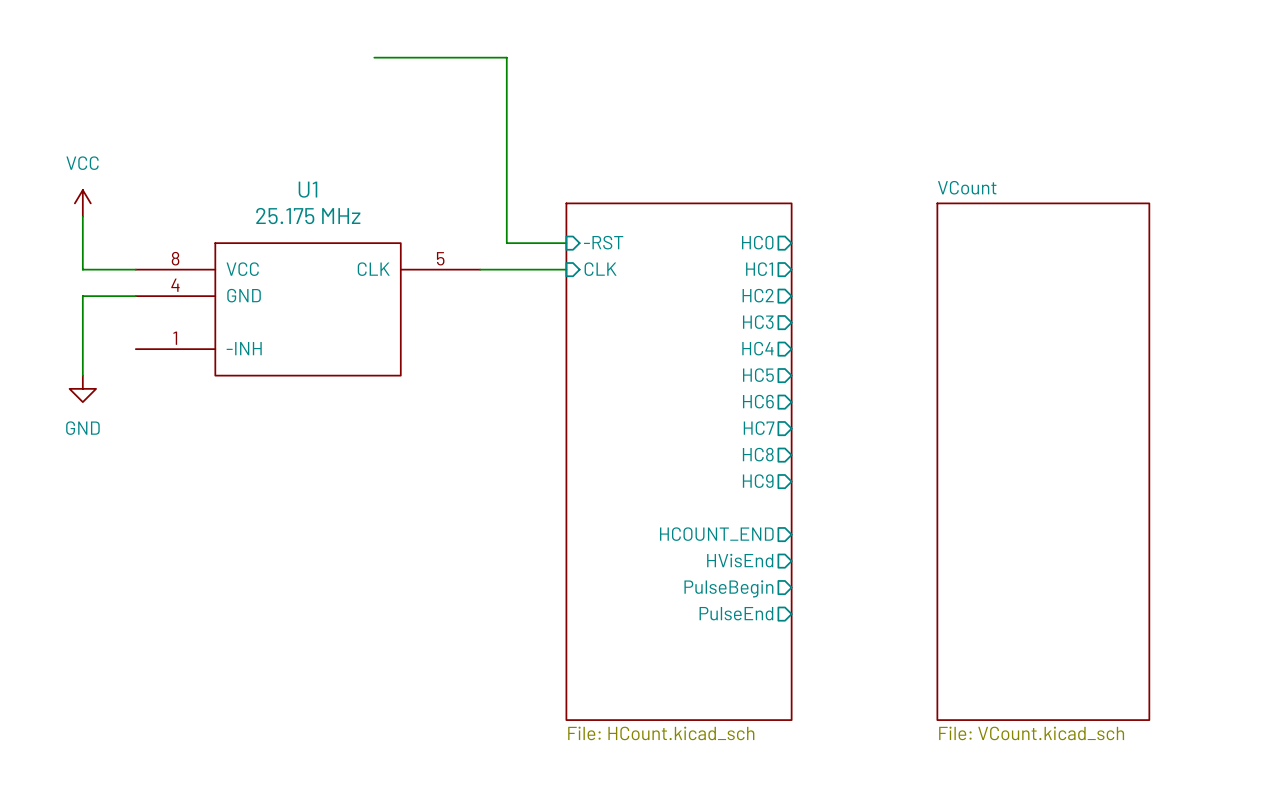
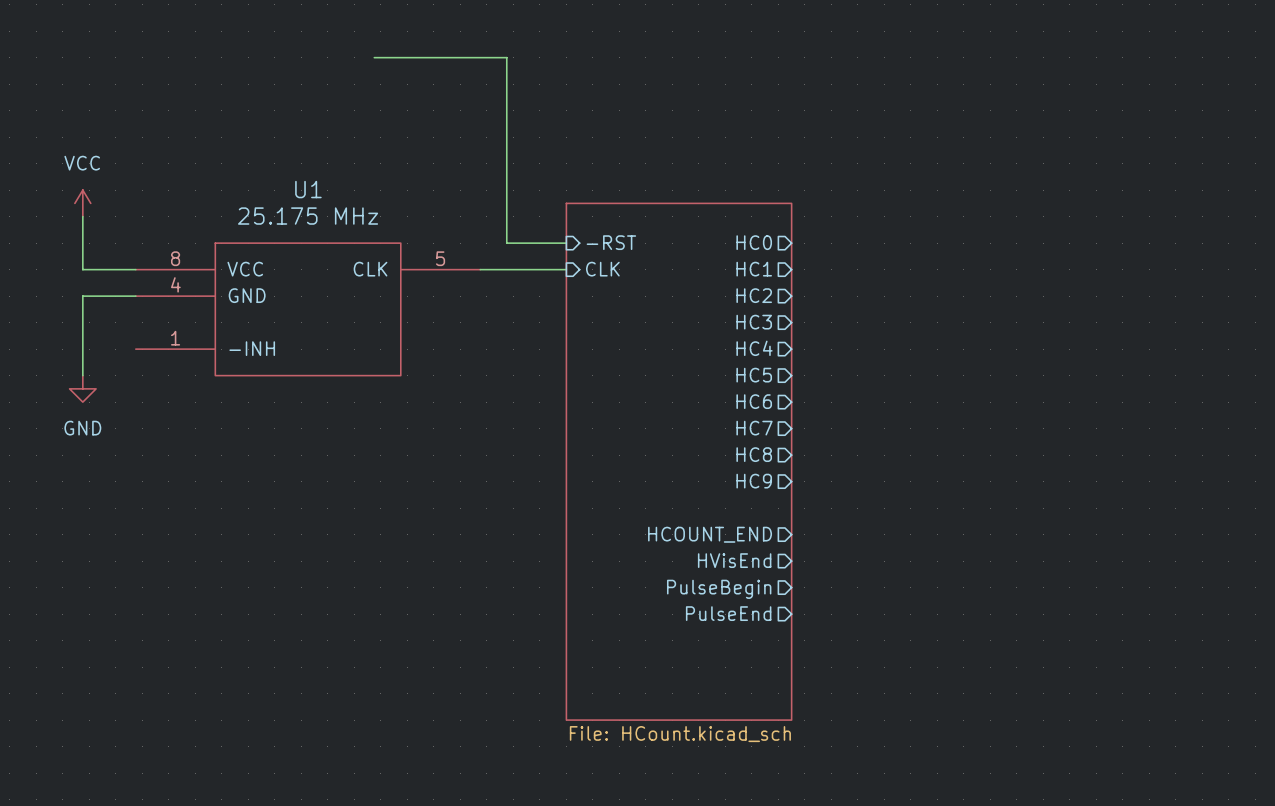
sheet VCount: File: VCount.kicad_sch (1043, 461) -> none

